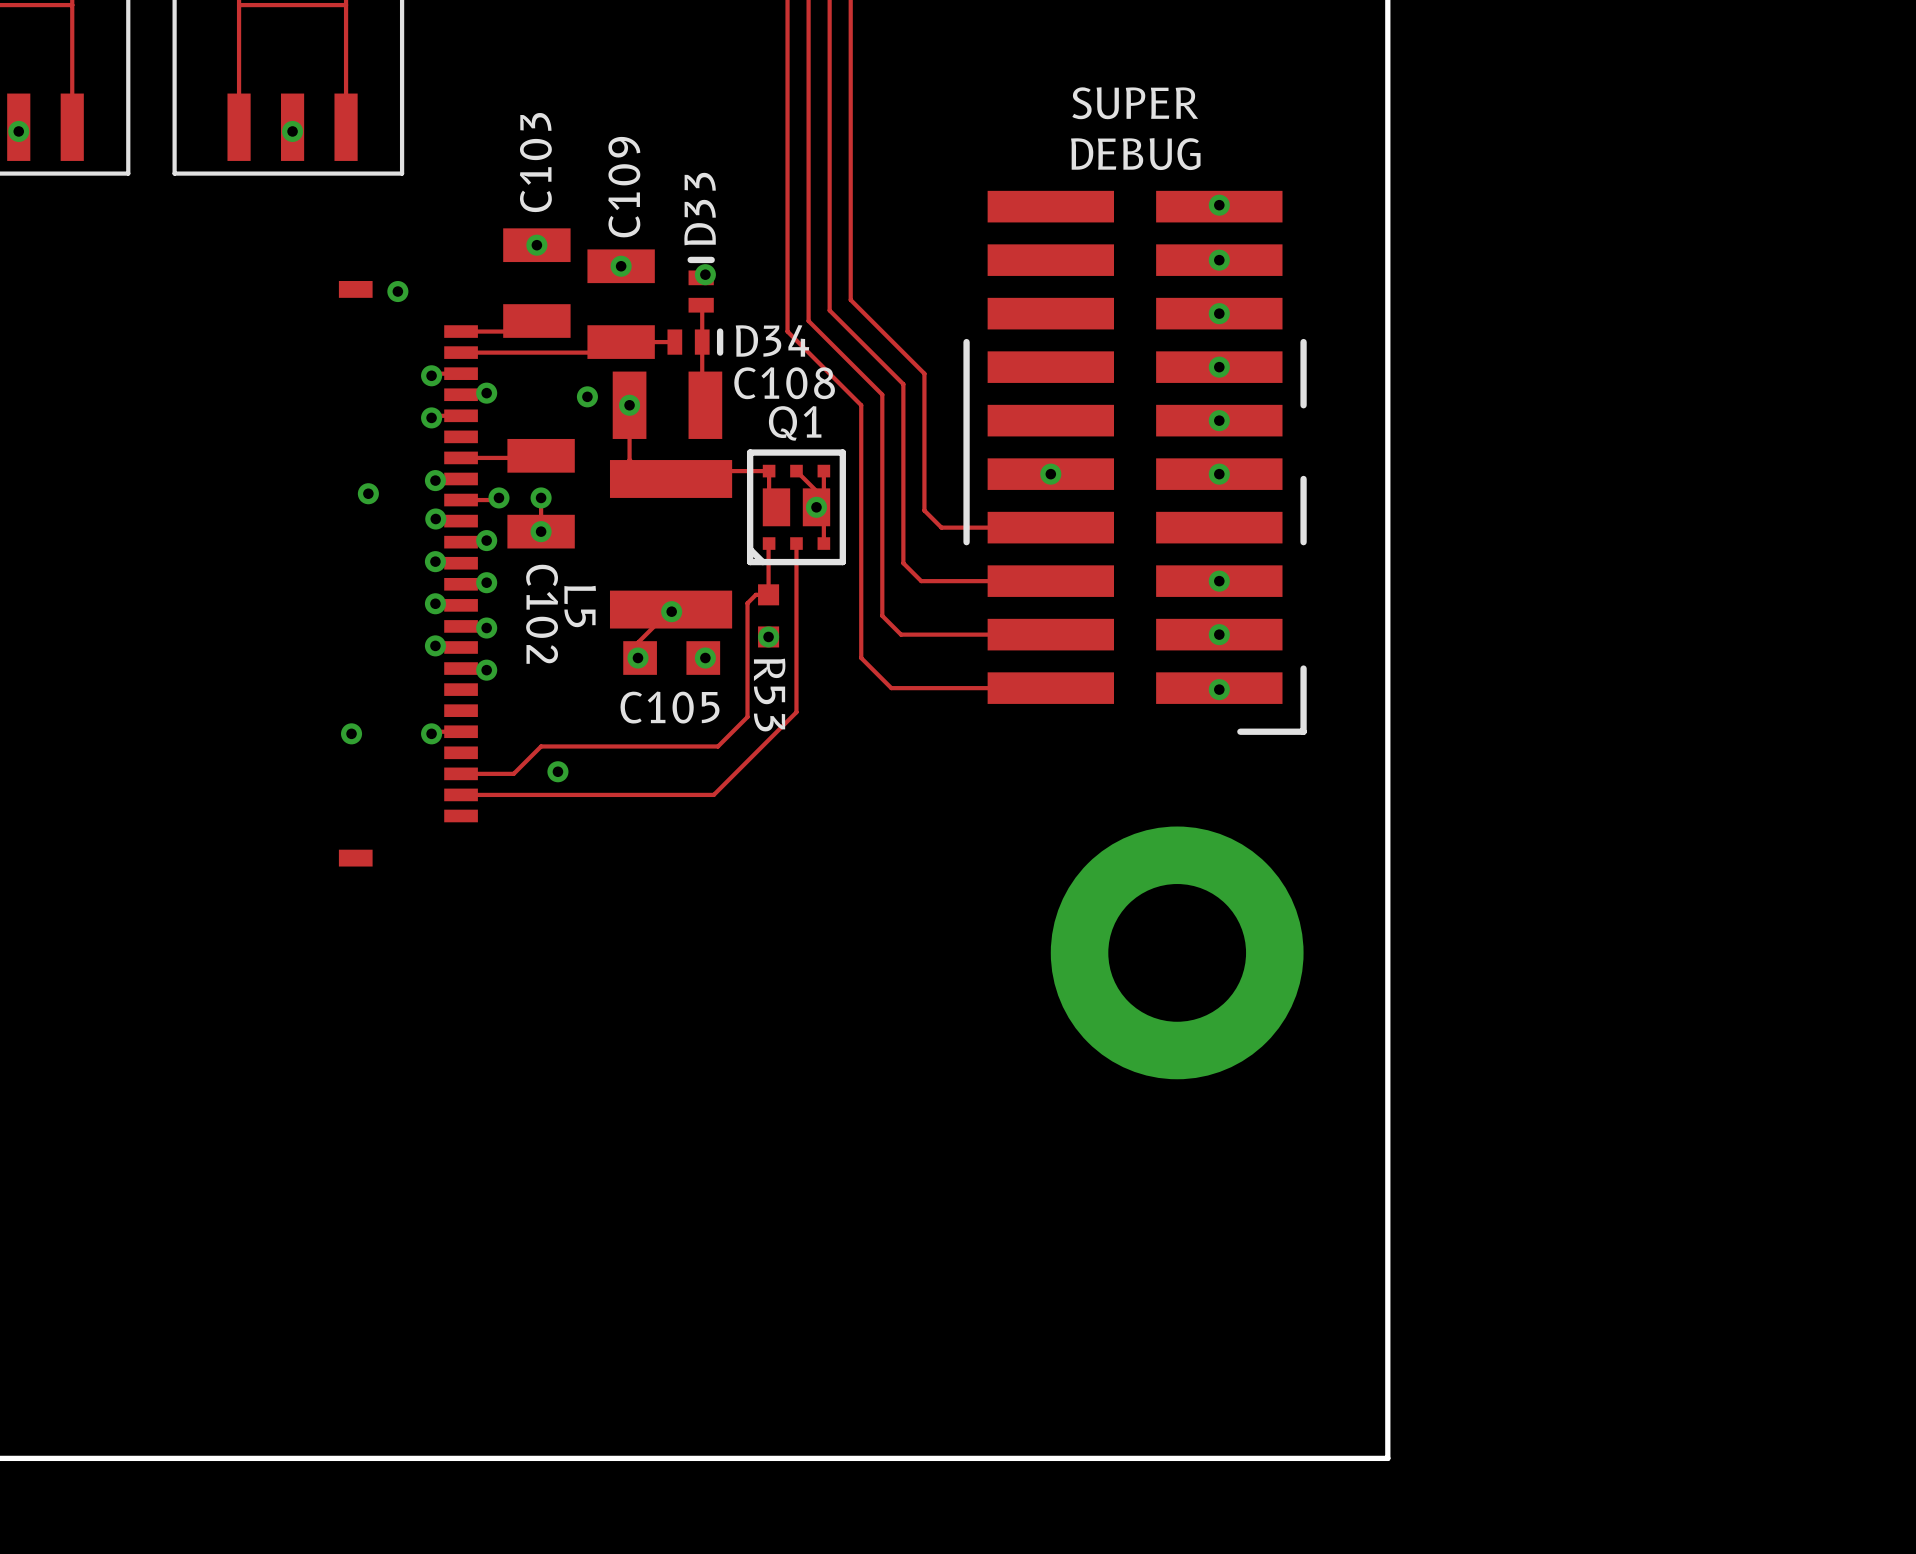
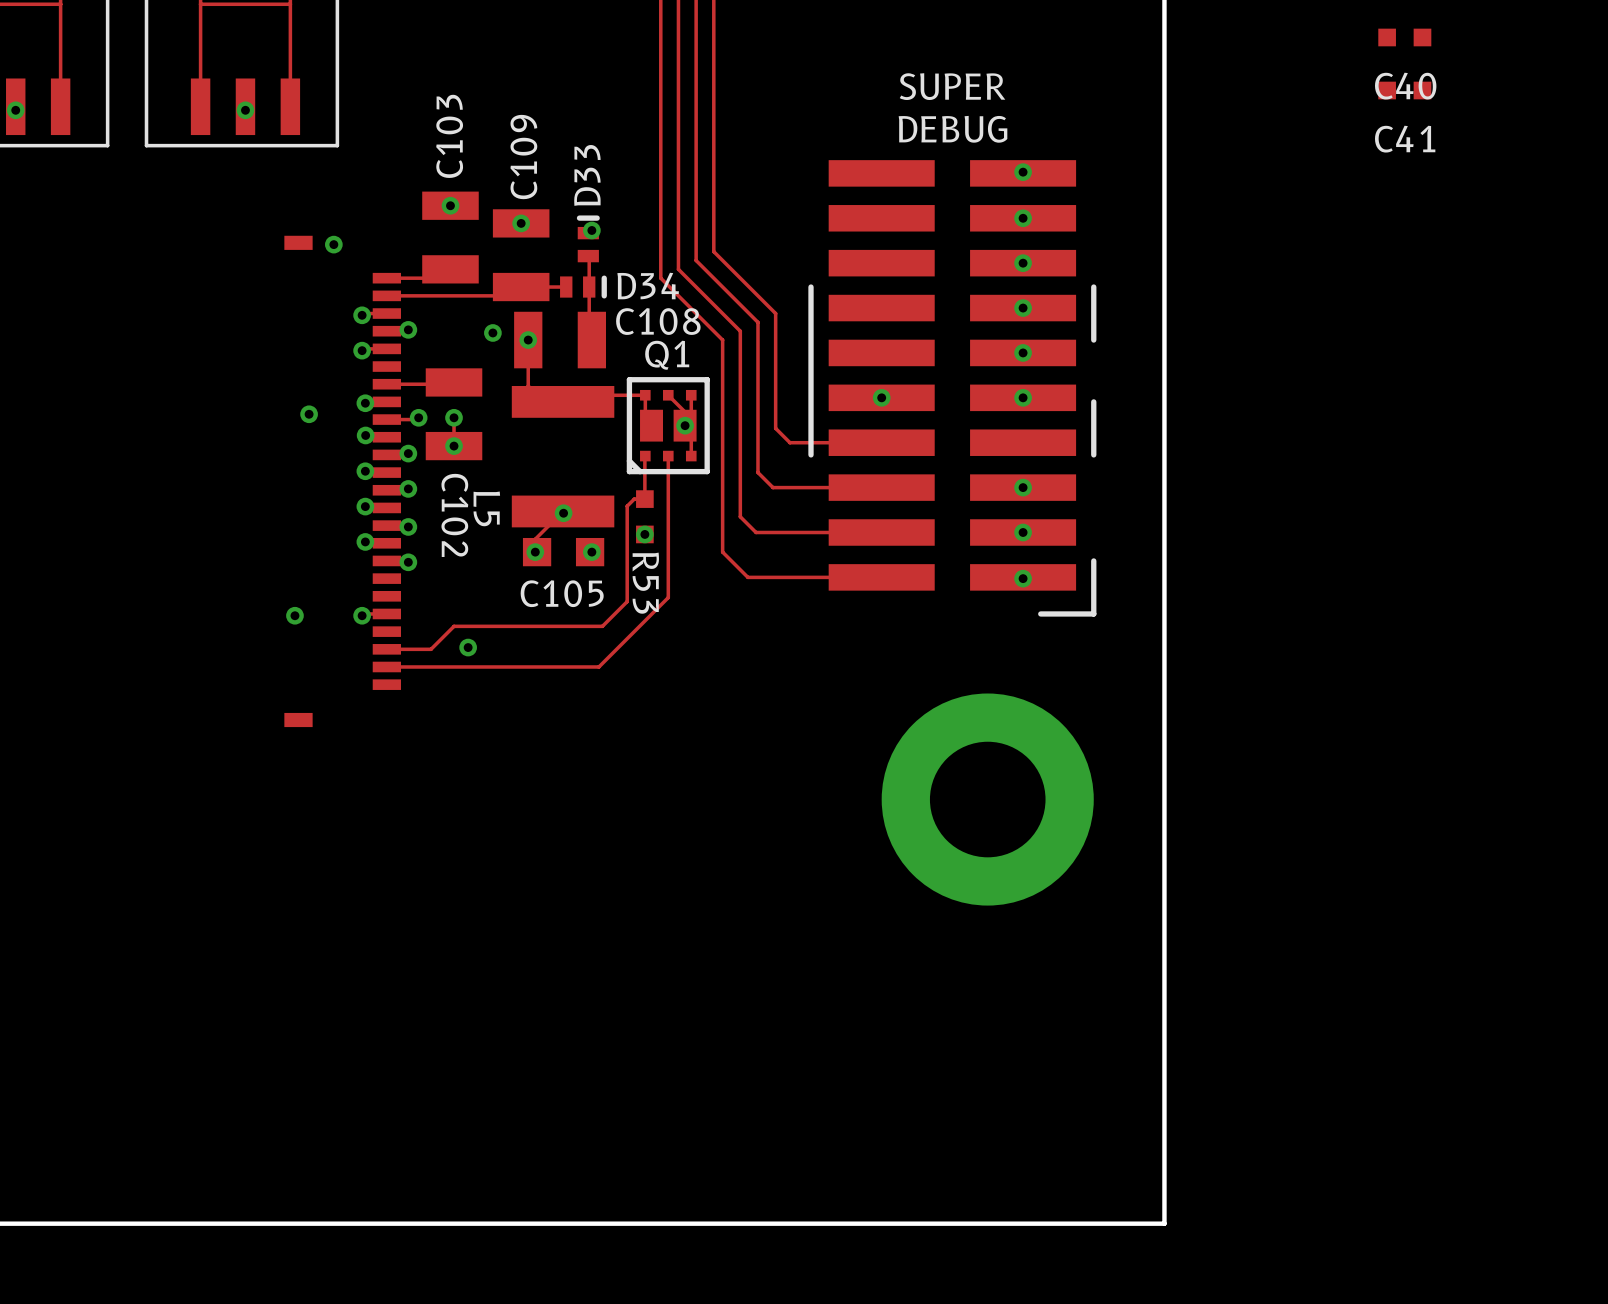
C40: none -> (1404, 37)
C41: none -> (1404, 90)

